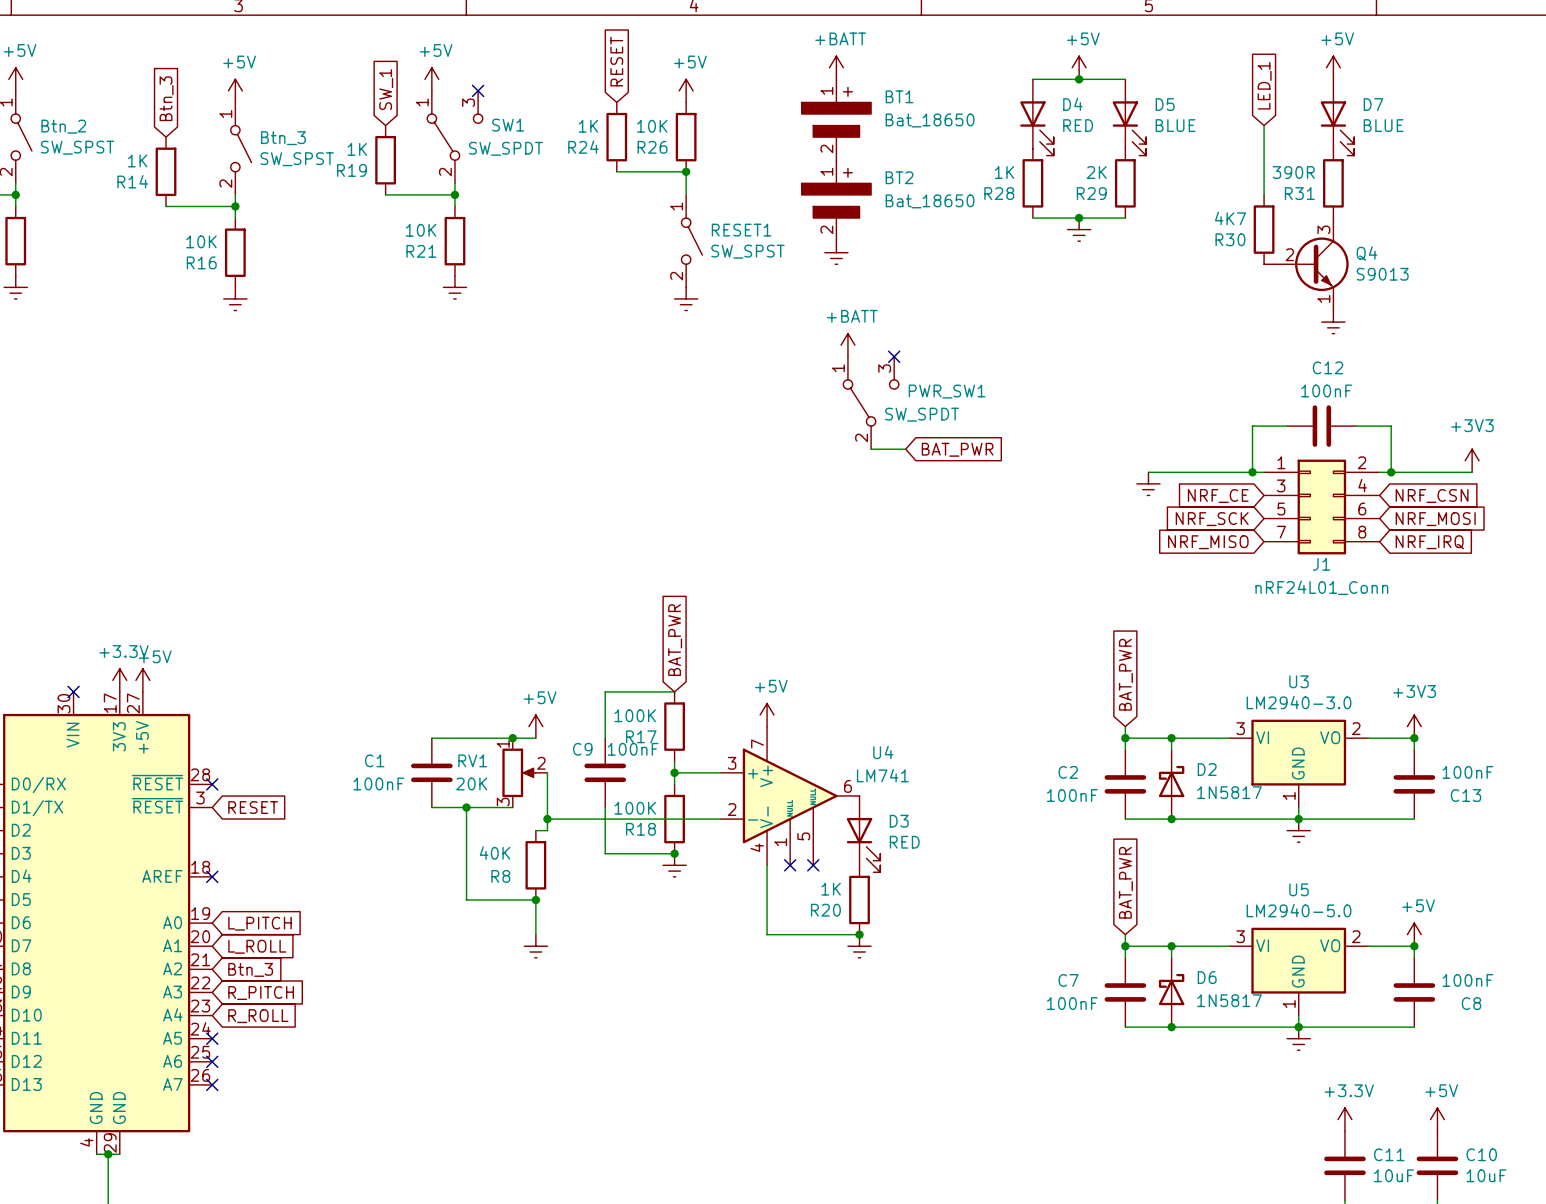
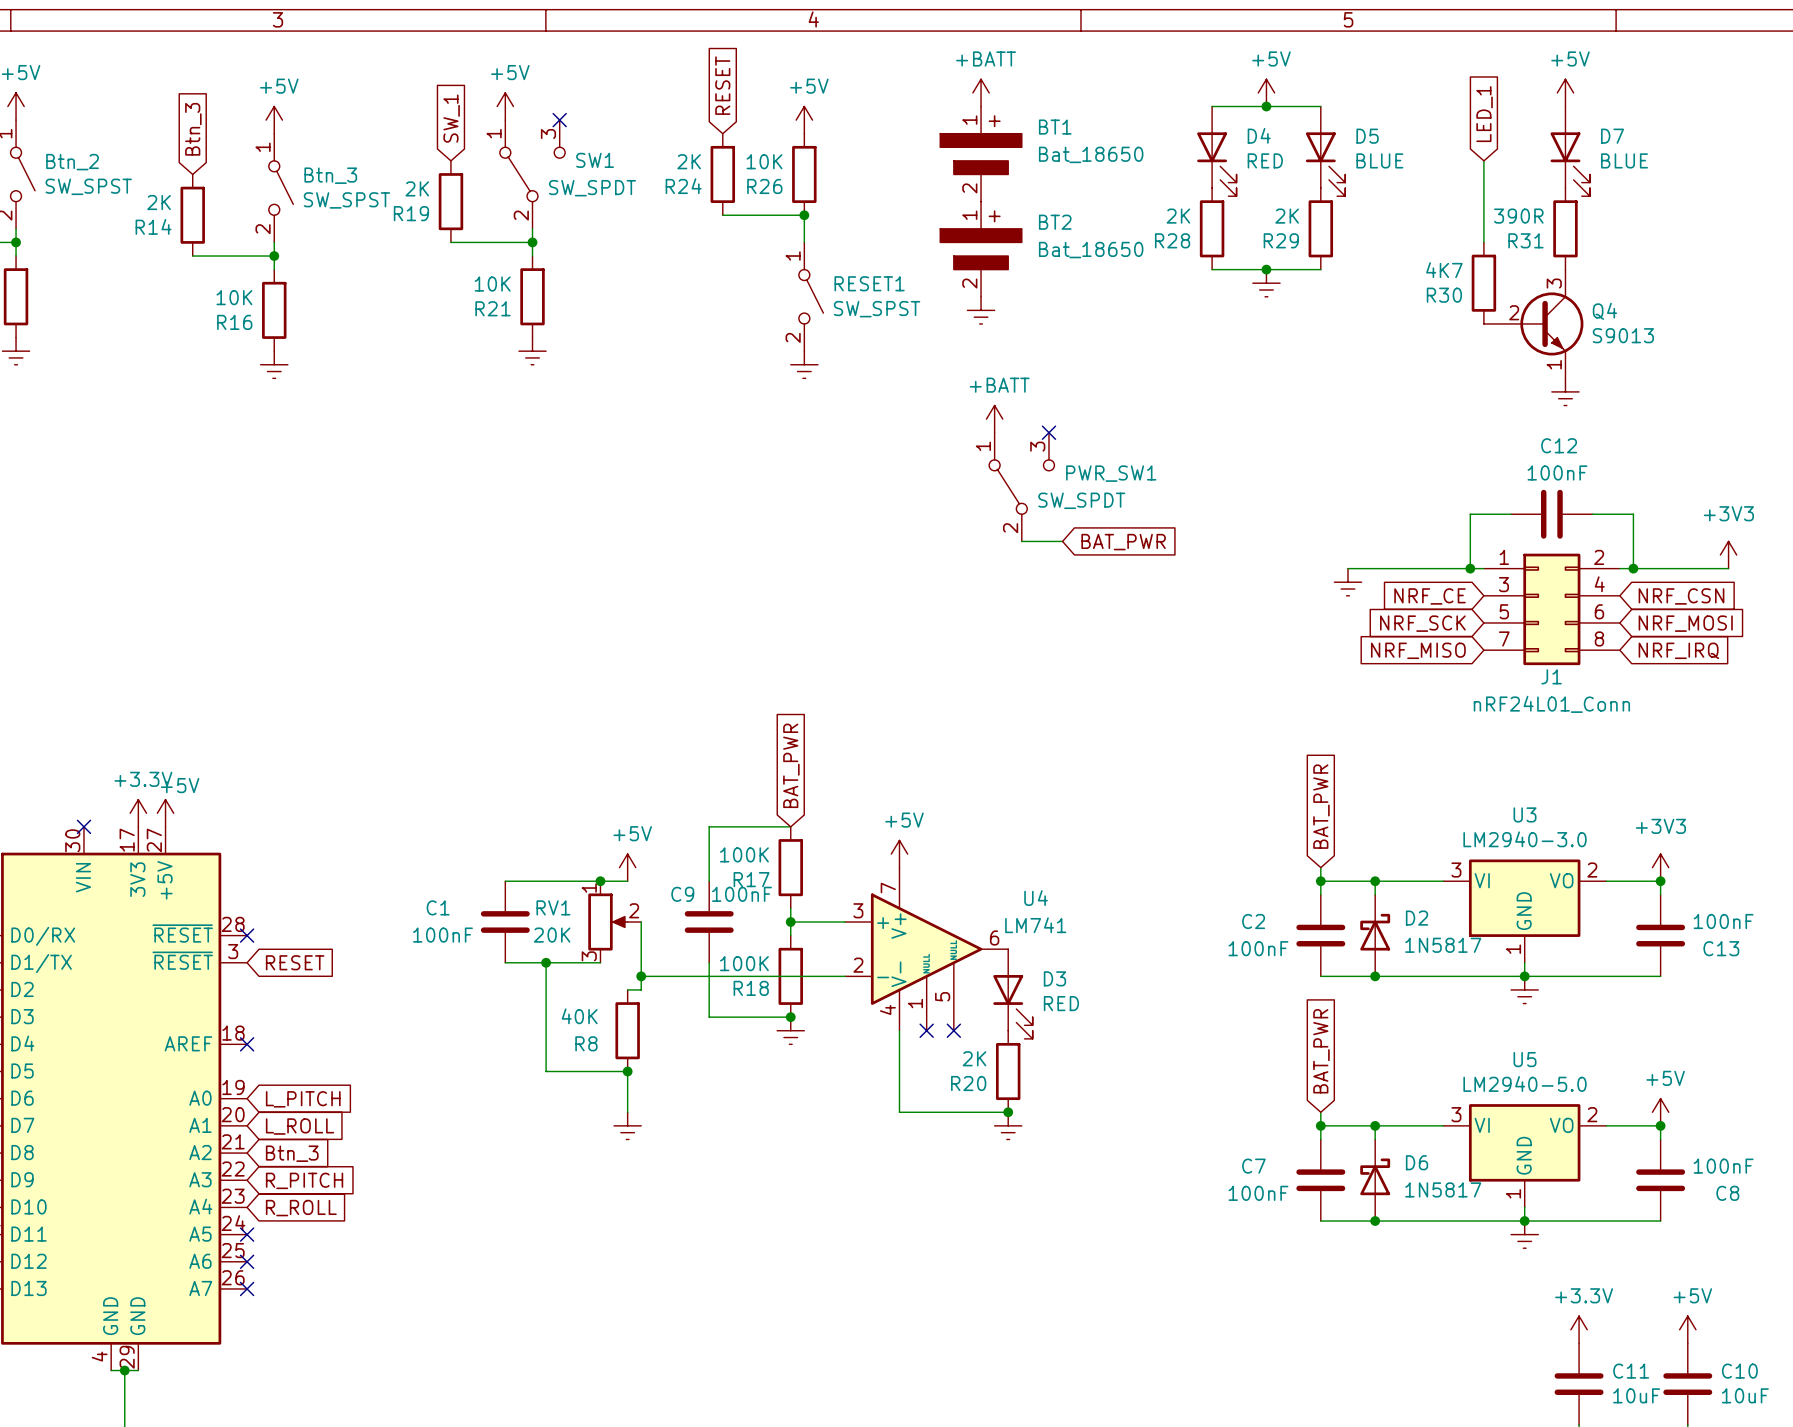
R24 value: 1K (588, 126) -> 2K (689, 161)
R19 value: 1K (357, 149) -> 2K (417, 188)
R14 value: 1K (137, 160) -> 2K (159, 202)
R28 value: 1K (1004, 172) -> 2K (1178, 216)
R20 value: 1K (831, 889) -> 2K (974, 1058)

